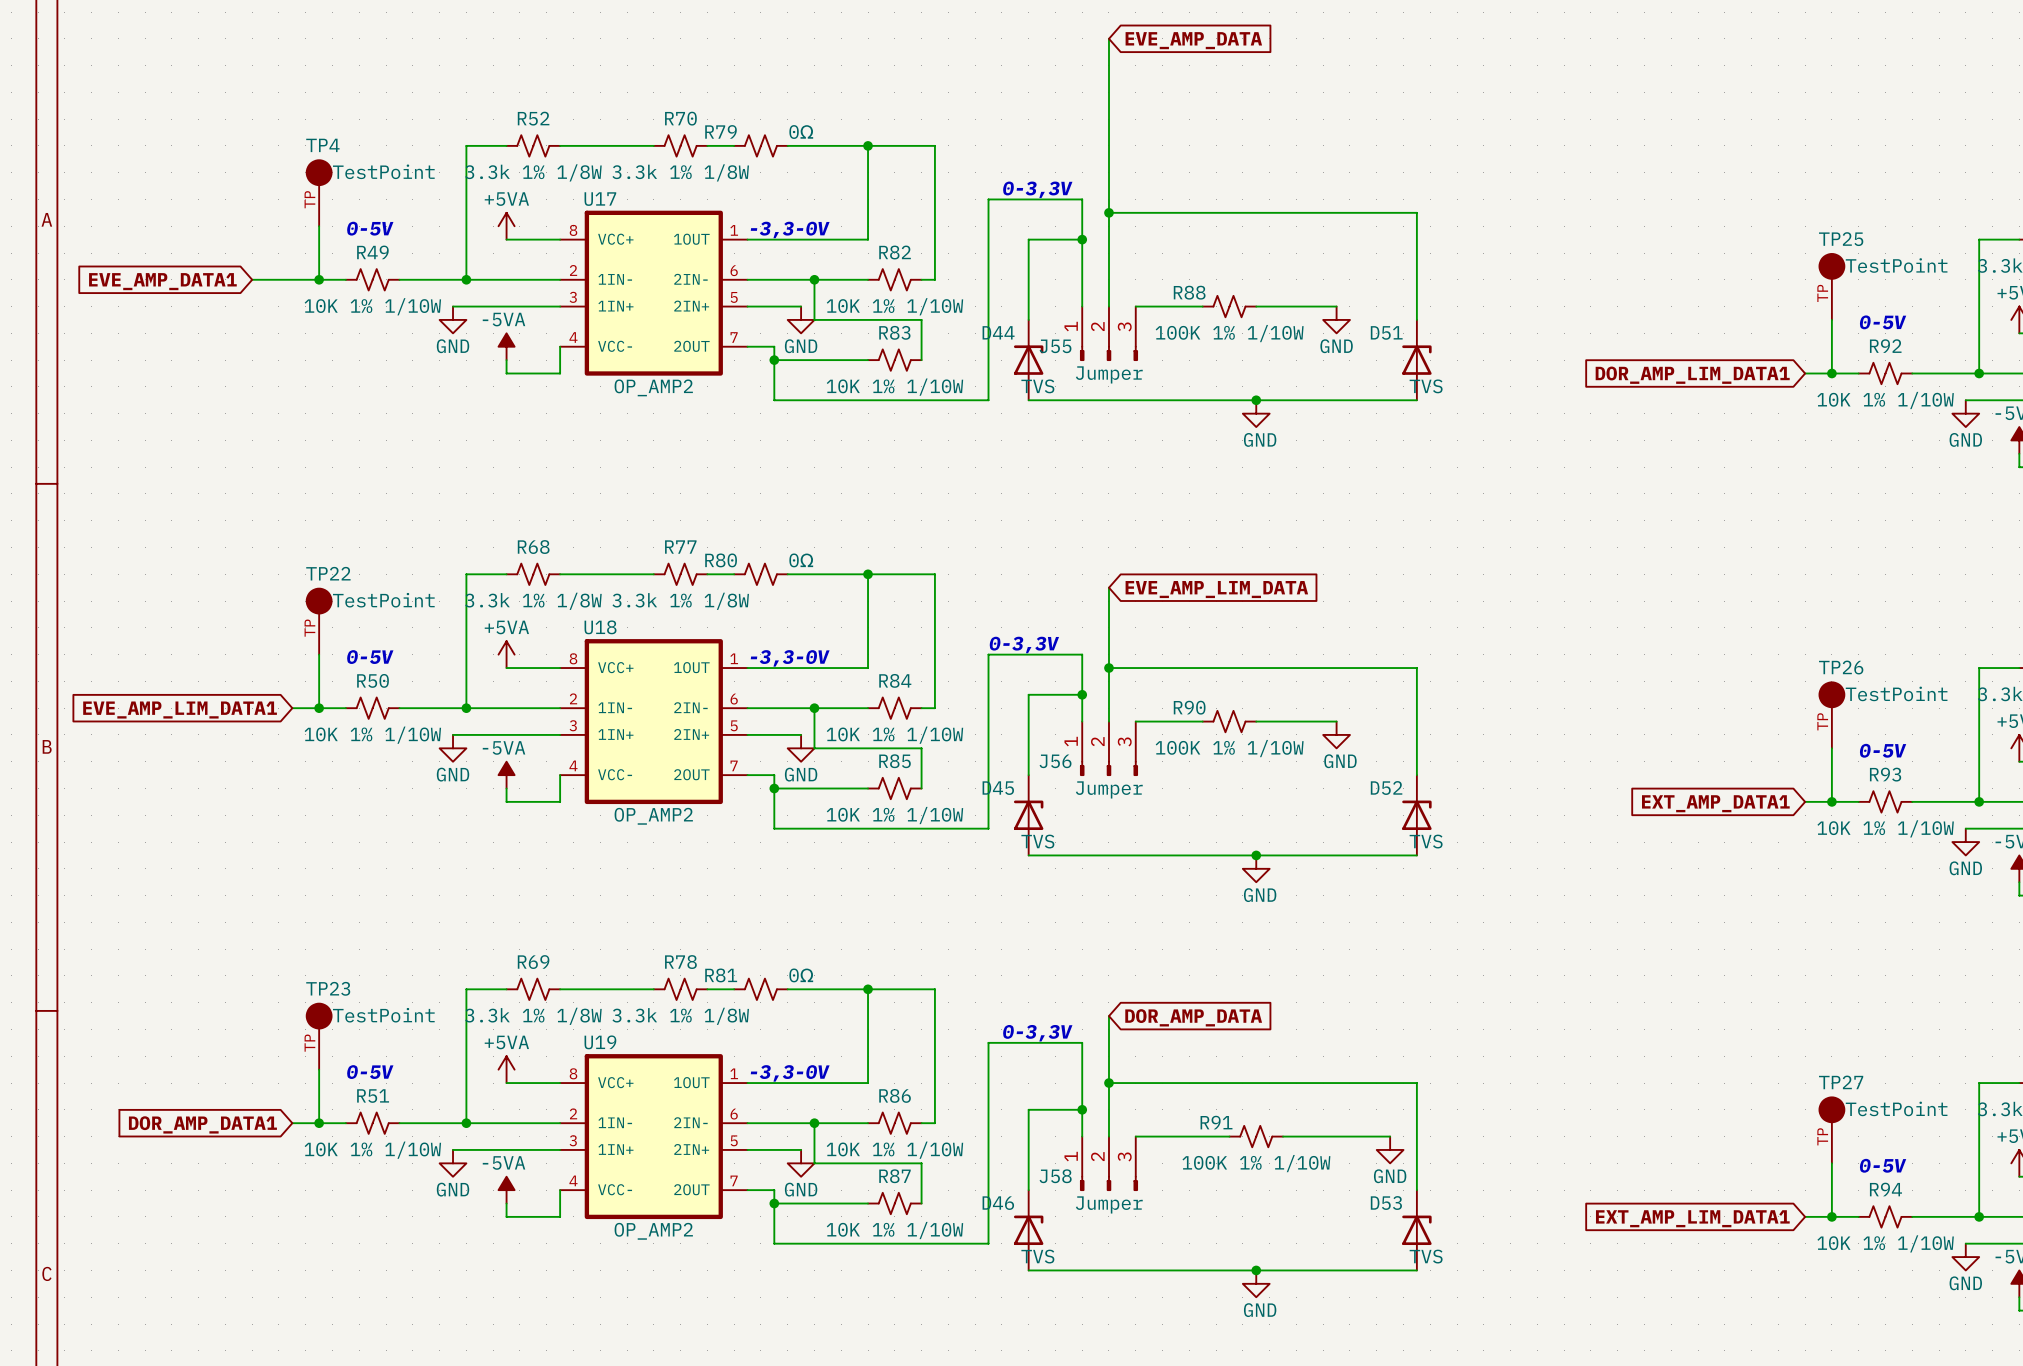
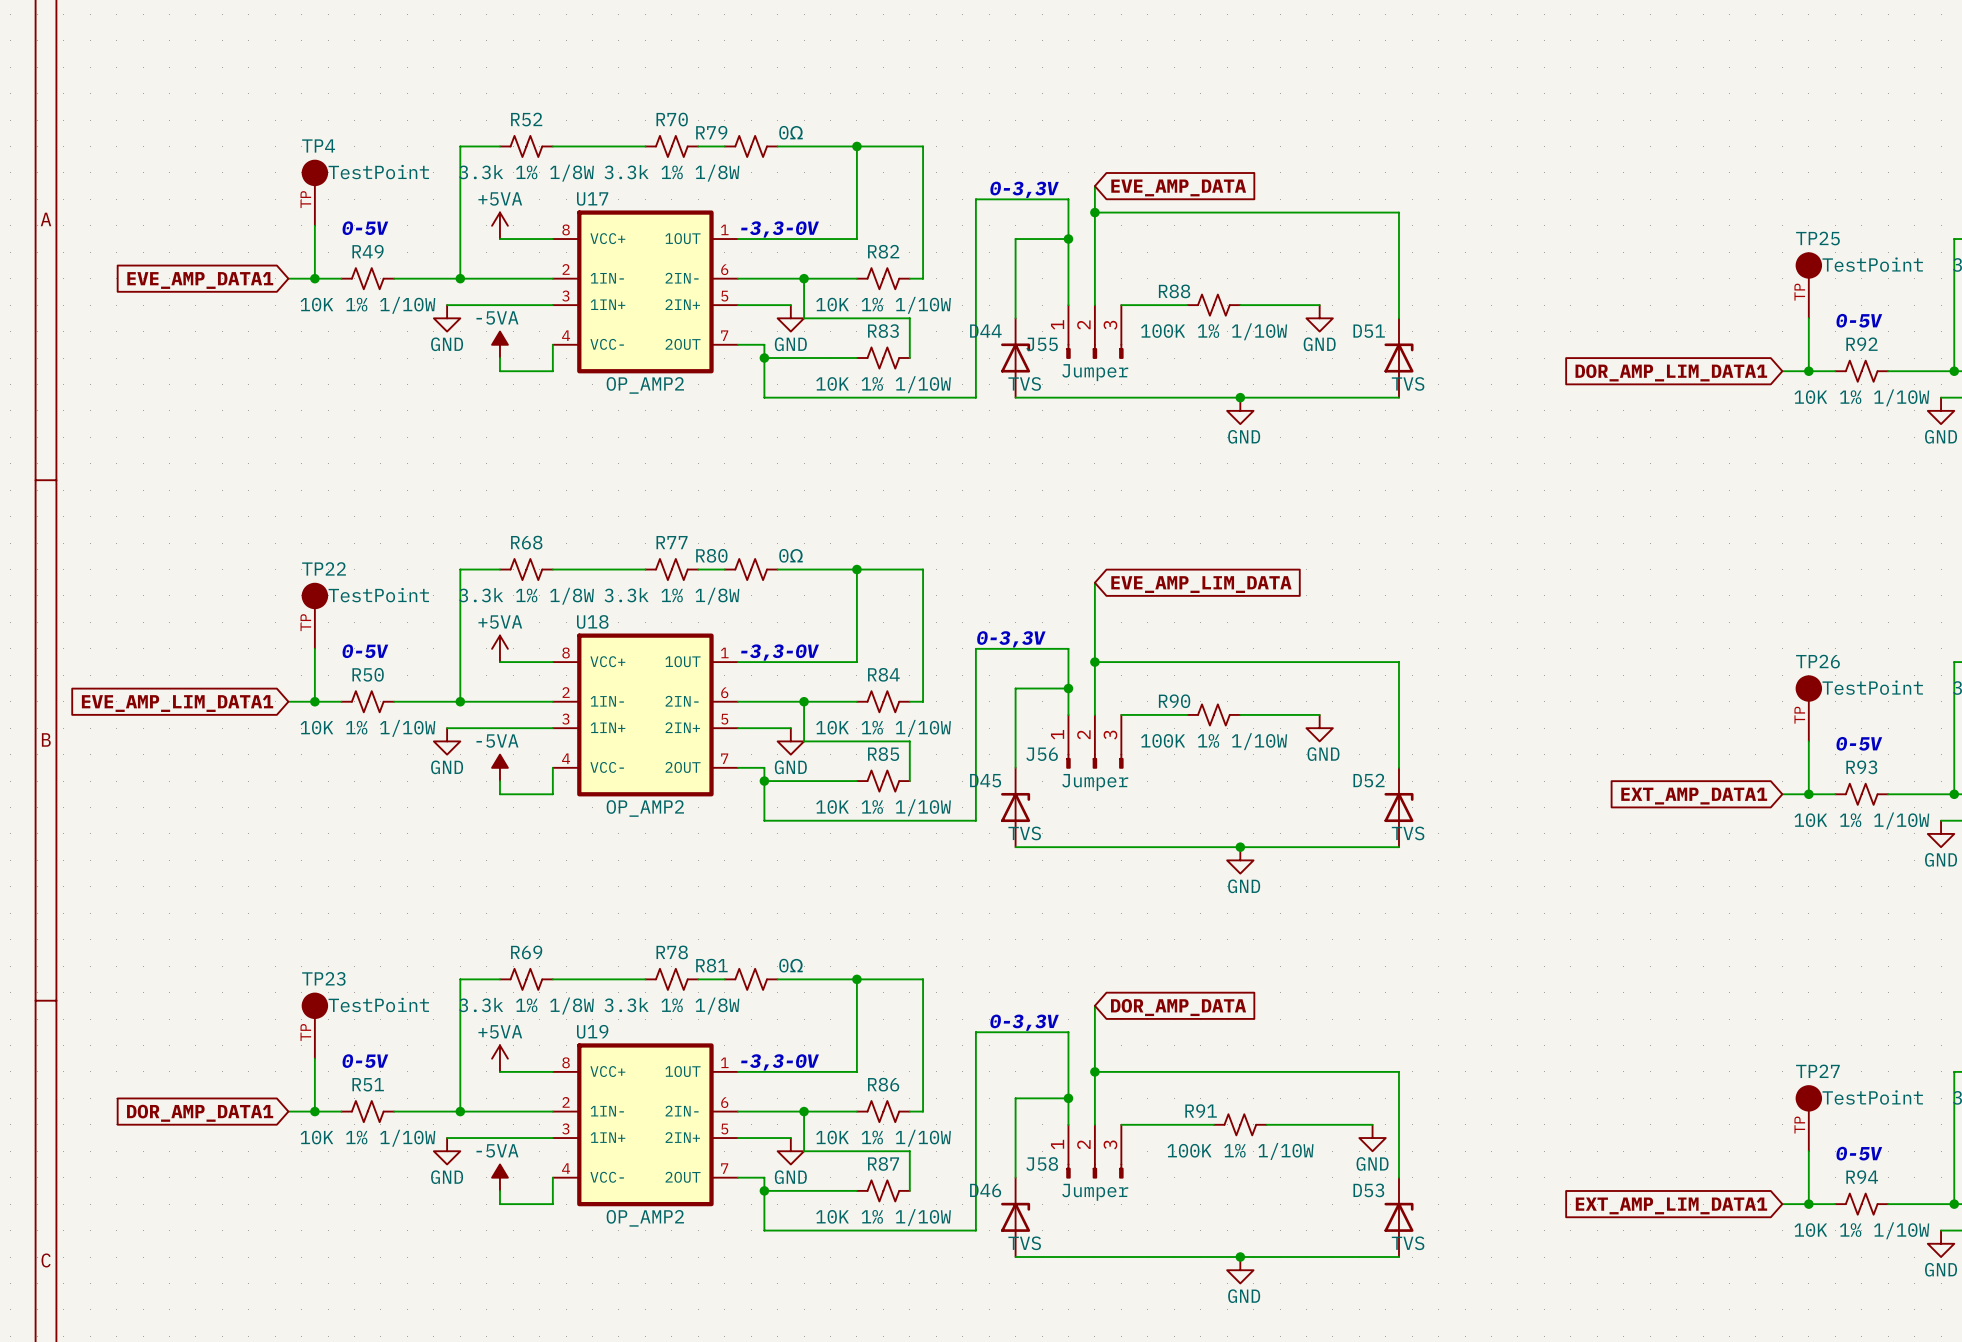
wire: (1108, 38) (1108, 186) -> none
global label position: EVE_AMP_DATA (1193, 40) -> EVE_AMP_DATA (1178, 187)
wire: (252, 279) (292, 279) -> none
global label position: EVE_AMP_DATA1 (162, 281) -> EVE_AMP_DATA1 (200, 280)

